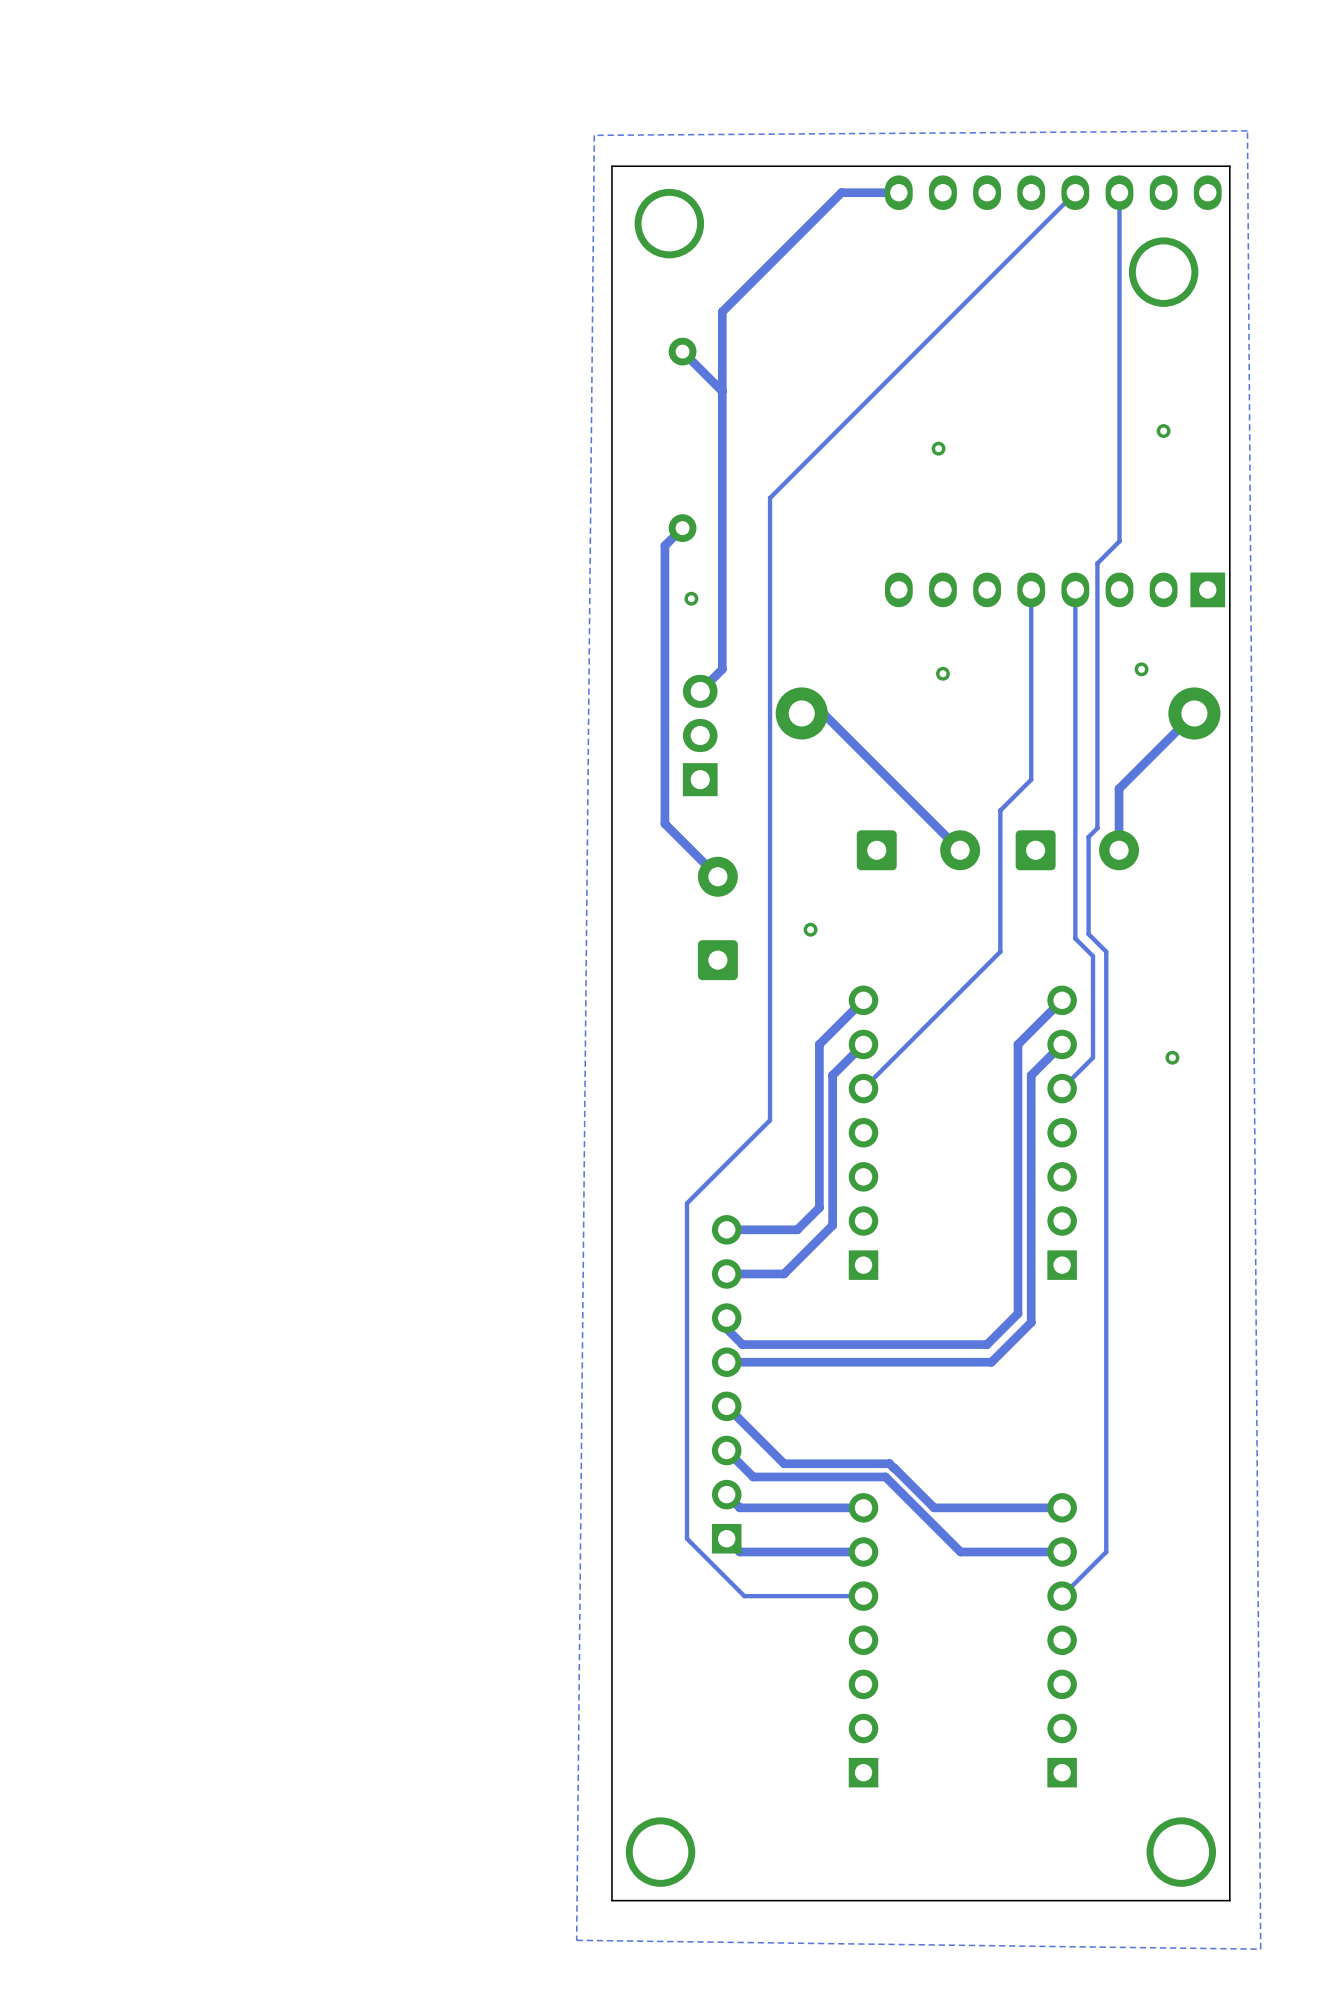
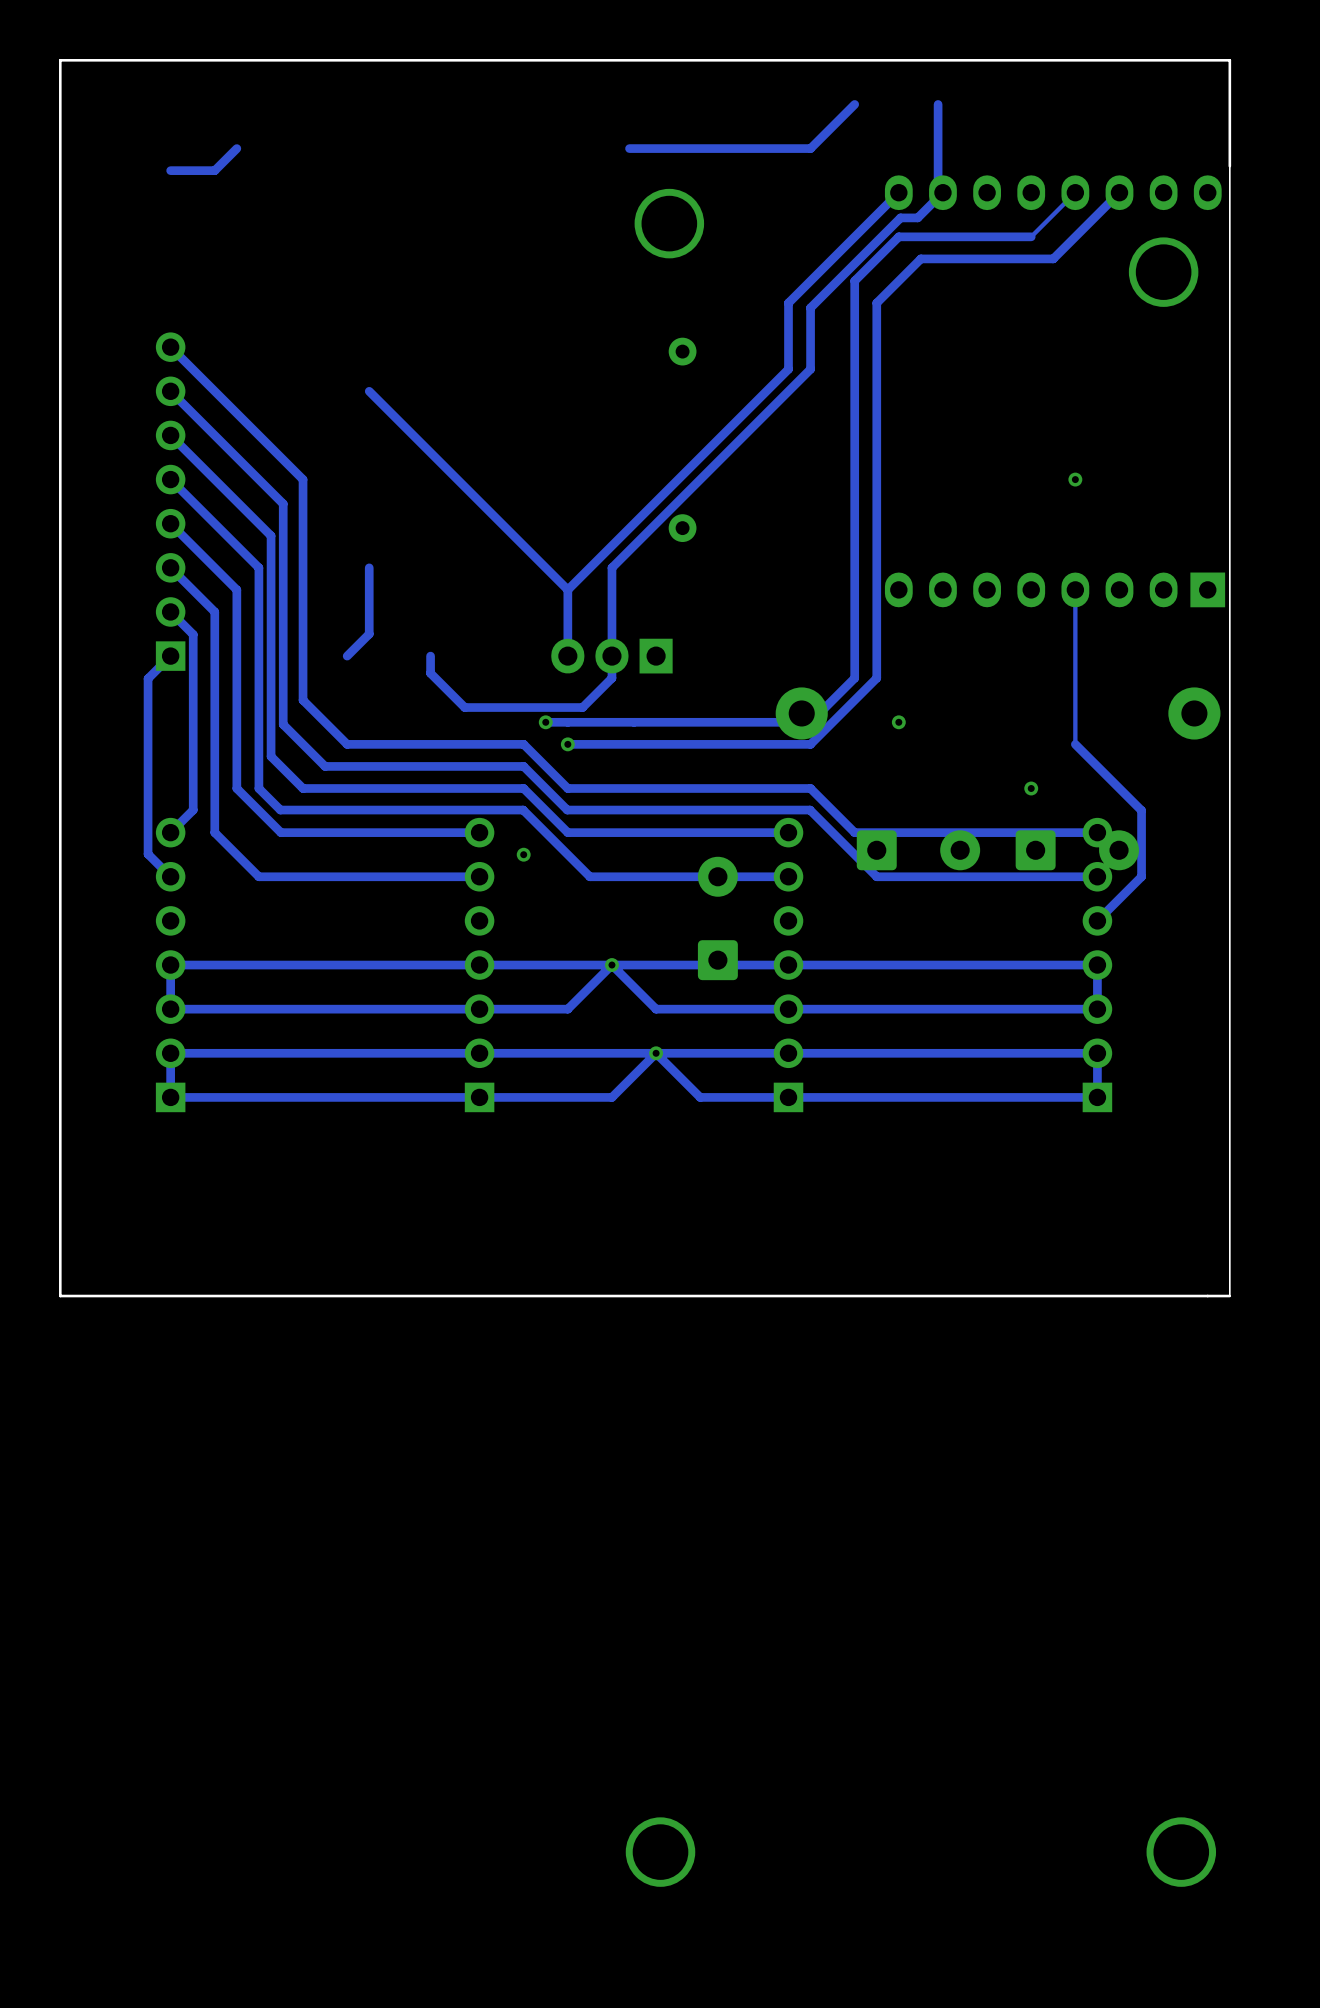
track: none -> (854, 104) (810, 148) (629, 148)
track: none -> (938, 104) (938, 187)
zone outline: (1247, 130) (1260, 1949) (576, 1940) (594, 135) (1247, 130) -> none
track: none -> (236, 148) (214, 170) (170, 170)
board edge: (1229, 166) (611, 166) (611, 1900) (1229, 1900) (1229, 1296) -> (1229, 166) (1229, 60) (60, 60) (60, 1296) (1229, 1296)
track: (898, 192) (841, 192) (722, 311) (722, 669) (700, 691) -> (898, 192) (788, 303) (788, 369) (567, 589)
track: none -> (942, 192) (917, 217) (900, 217) (810, 307) (810, 369) (611, 567) (611, 678) (582, 707) (464, 707) (430, 673) (430, 656)
track: (1119, 192) (1119, 541) (1097, 563) (1097, 828) (1088, 837) (1088, 934) (1106, 951) (1106, 1551) (1062, 1596) -> (1119, 192) (1053, 258) (920, 258) (876, 303) (876, 678) (810, 744) (567, 744)
track: (1031, 236) (770, 498) (770, 1120) (686, 1203) (686, 1538) (744, 1596) (863, 1596) -> (1031, 236) (898, 236) (854, 280) (854, 678) (810, 722) (545, 722)
track: none -> (170, 347) (303, 479) (303, 700) (347, 744) (523, 744) (567, 788) (810, 788) (854, 832) (1097, 832)
track: (682, 351) (722, 391) -> none
track: none -> (170, 391) (283, 503) (283, 724) (325, 766) (523, 766) (567, 810) (810, 810) (876, 876) (1097, 876)
track: none -> (369, 391) (567, 589)
via: (1163, 431) -> none
track: none -> (170, 435) (271, 535) (271, 756) (303, 788) (523, 788) (567, 832) (788, 832)
via: (938, 448) -> none
track: none -> (170, 479) (258, 567) (258, 788) (280, 810) (523, 810) (589, 876) (788, 876)
via: none -> (1075, 479)
part: none -> (170, 501)
track: none -> (170, 523) (236, 589) (236, 788) (280, 832) (479, 832)
track: (682, 528) (664, 545) (664, 823) (717, 876) -> none
track: none -> (170, 567) (214, 611) (214, 832) (258, 876) (479, 876)
track: none -> (369, 567) (369, 634) (347, 656)
track: none -> (567, 589) (567, 656)
track: (1031, 589) (1031, 779) (1000, 810) (1000, 951) (863, 1088) -> none
via: (691, 598) -> none
track: none -> (170, 611) (193, 634) (193, 810) (170, 832)
track: none -> (170, 656) (148, 678) (148, 854) (170, 876)
via: (1141, 669) -> none
via position: (942, 673) -> (898, 722)
track: (801, 713) (823, 713) (960, 850) -> none
track: (1194, 713) (1119, 788) (1119, 850) -> none
via: none -> (545, 722)
part rotation: 0° (700, 735) -> 90° counterclockwise (611, 656)
part position: (700, 735) -> (611, 656)
via: none -> (567, 744)
track: (1075, 744) (1075, 938) (1093, 956) (1093, 1057) (1062, 1088) -> (1075, 744) (1141, 810) (1141, 876) (1097, 920)
via: none -> (1031, 788)
via: none -> (523, 854)
via: (810, 929) -> none
part: none -> (170, 965)
part: none -> (479, 965)
via: none -> (611, 965)
part: none -> (788, 965)
track: none -> (1097, 965) (1097, 1009) (656, 1009) (611, 965) (567, 1009) (170, 1009) (170, 965) (1097, 965)
part: none -> (1097, 965)
track: (863, 1000) (819, 1044) (819, 1207) (797, 1229) (726, 1229) -> none
track: (1062, 1000) (1017, 1044) (1017, 1313) (987, 1344) (742, 1344) (726, 1328) (726, 1318) -> none
track: (863, 1044) (832, 1075) (832, 1225) (784, 1273) (726, 1273) -> none
track: (1062, 1044) (1031, 1075) (1031, 1322) (991, 1362) (726, 1362) -> none
via: none -> (656, 1053)
track: none -> (1097, 1053) (1097, 1097) (700, 1097) (656, 1053) (611, 1097) (170, 1097) (170, 1053) (1097, 1053)
via: (1172, 1057) -> none
part: (863, 1132) -> none
part: (1062, 1132) -> none
part: (726, 1384) -> none
track: (726, 1406) (784, 1463) (889, 1463) (934, 1507) (1062, 1507) -> none
track: (726, 1450) (753, 1476) (885, 1476) (960, 1551) (1062, 1551) -> none
track: (726, 1494) (739, 1507) (863, 1507) -> none
track: (726, 1538) (739, 1551) (863, 1551) -> none
part: (863, 1640) -> none
part: (1062, 1640) -> none

